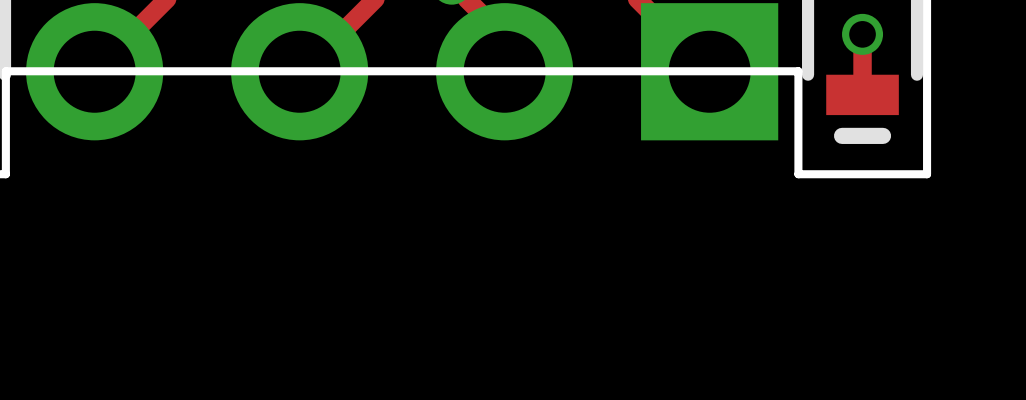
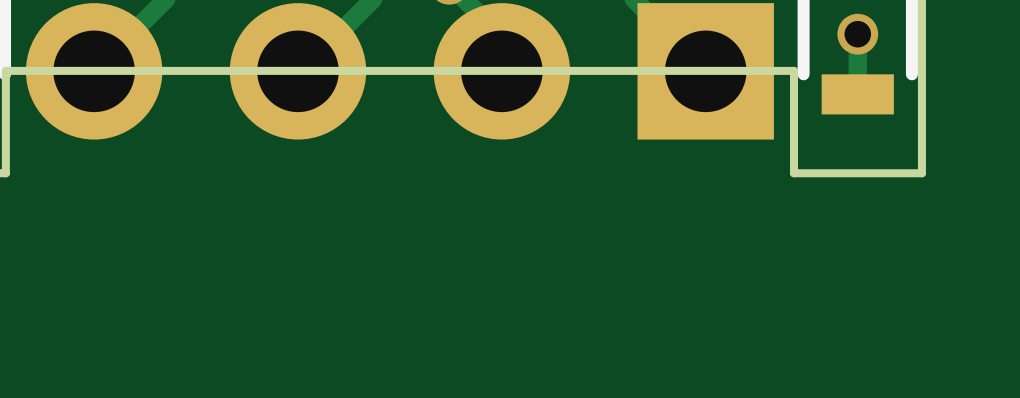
line: (842, 135) (883, 135) -> none

